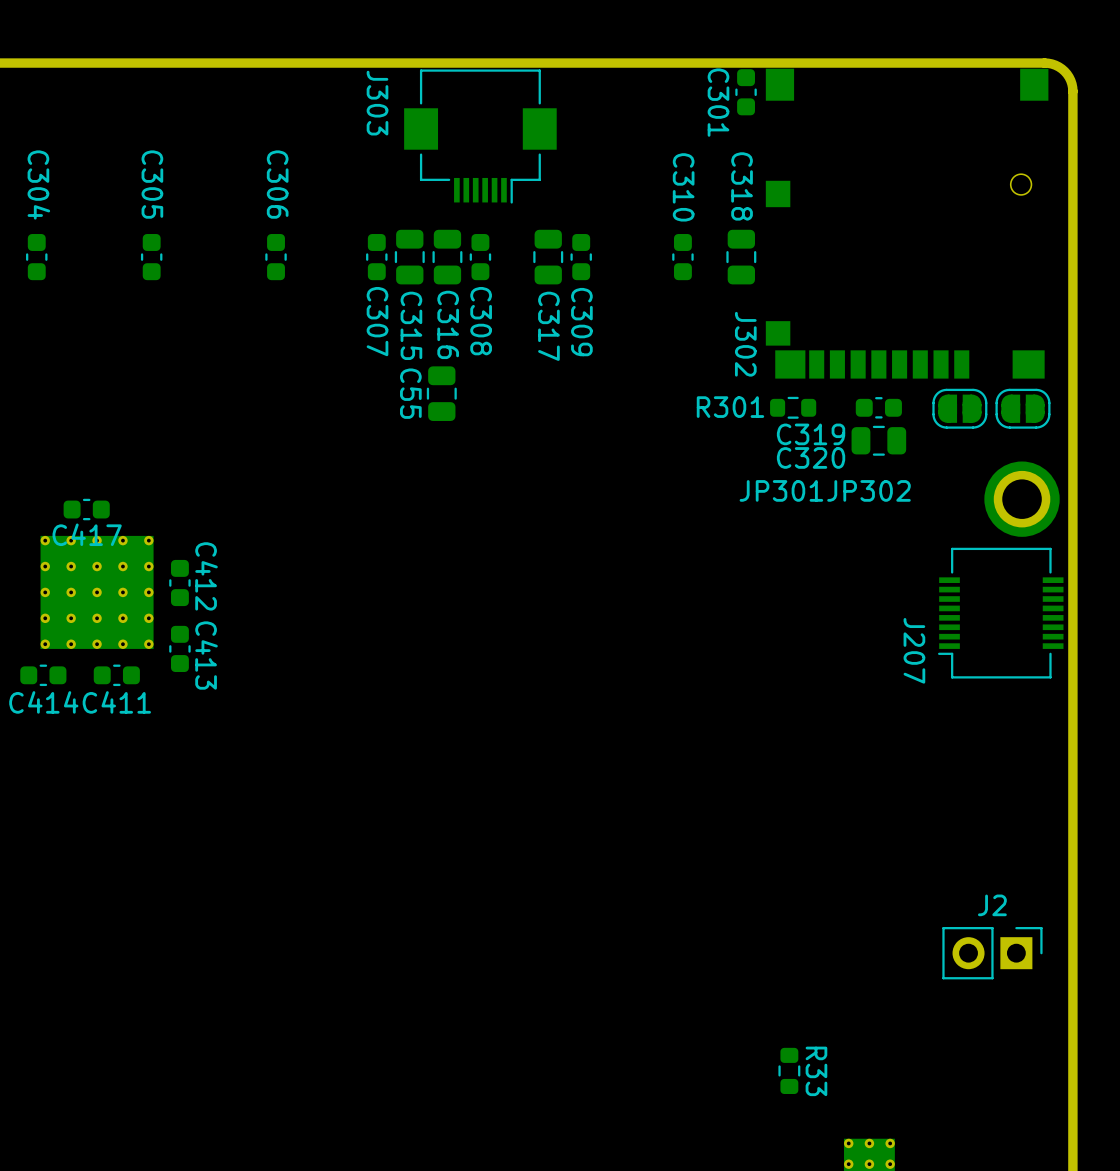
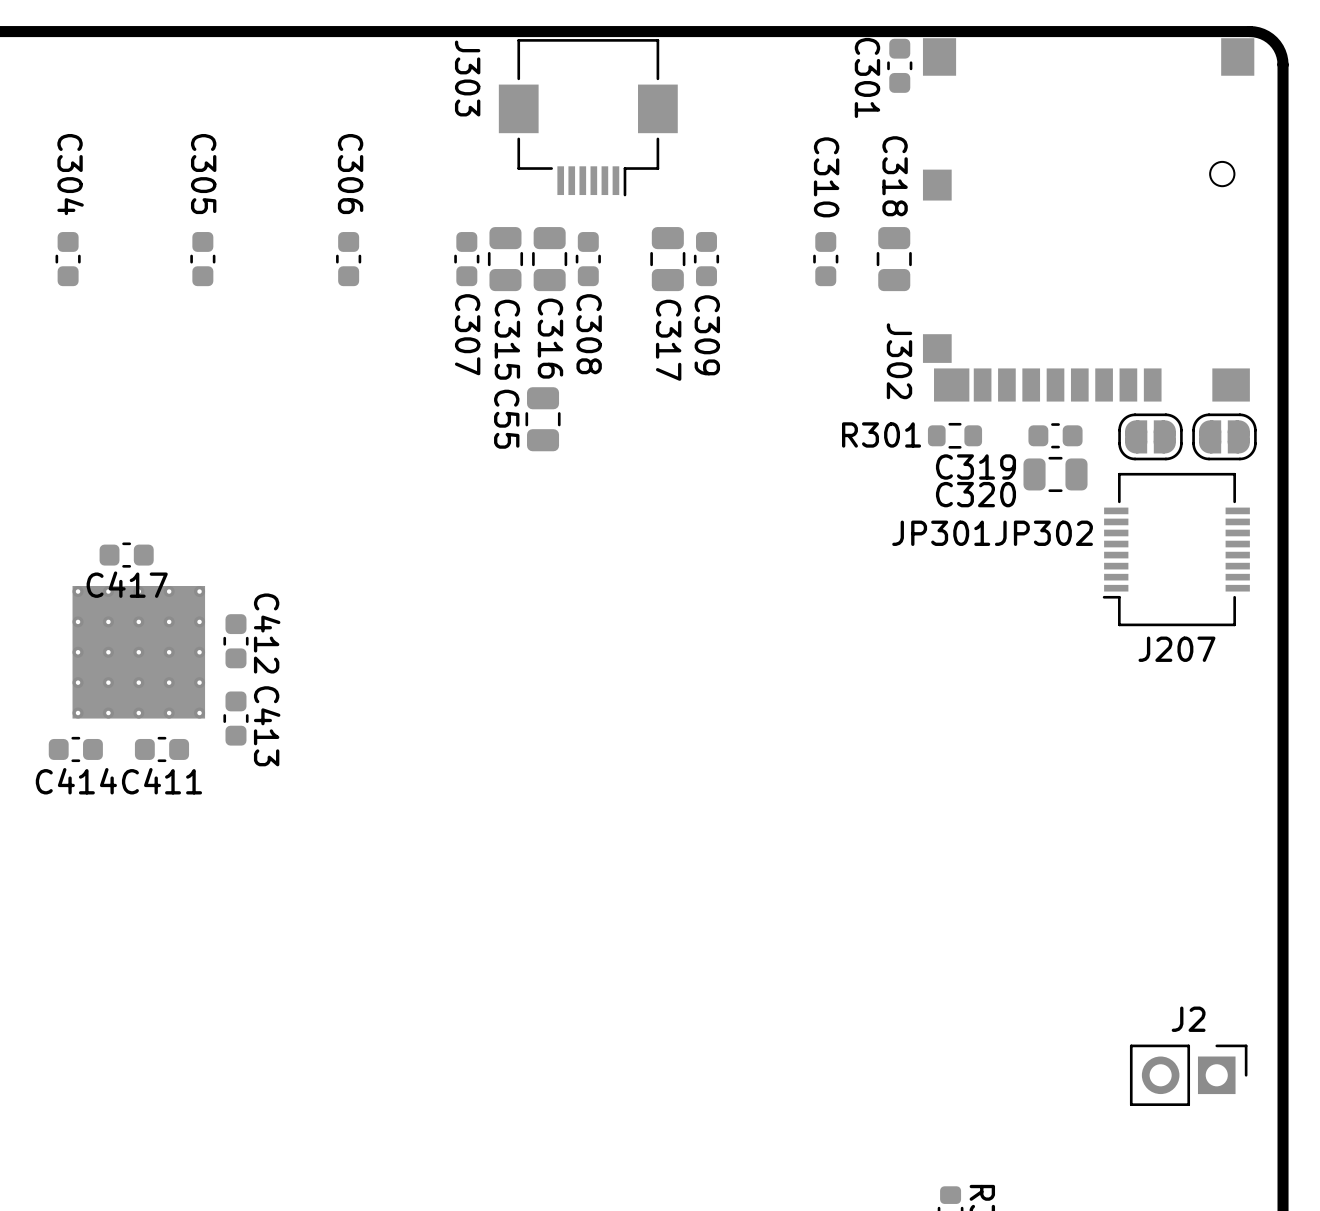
part: (1022, 499) -> none
J207 position: (1000, 613) -> (1176, 549)
J207 name rotation: 0° (914, 650) -> 90° counterclockwise (1176, 649)
J207 name position: J207 (914, 650) -> J207 (1176, 649)

